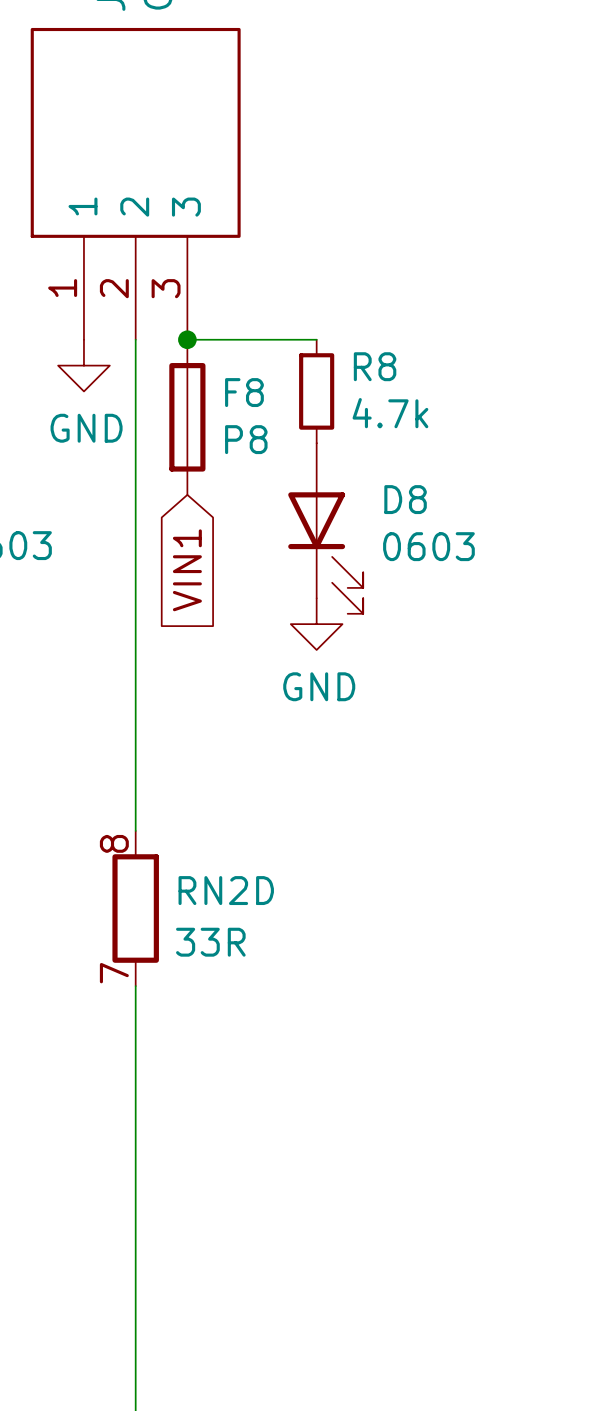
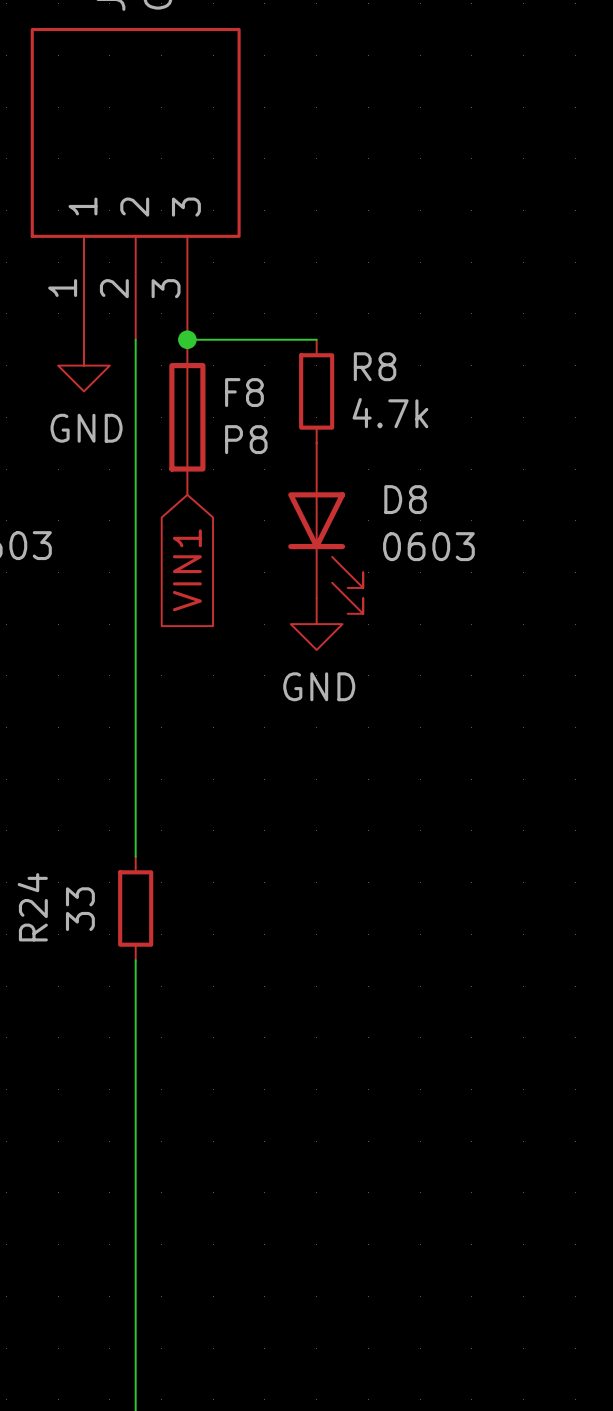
RN2D: 33R (135, 908) -> none
R24: none -> 33 (135, 908)

